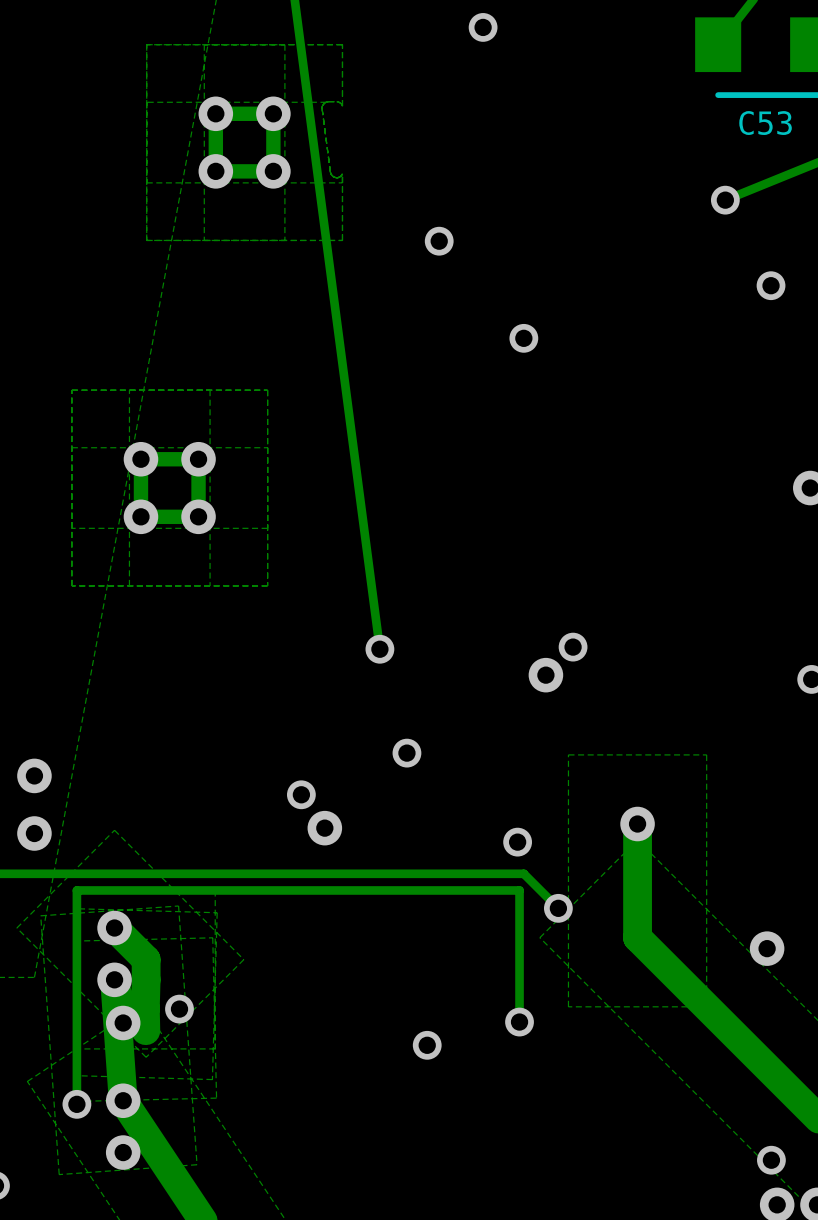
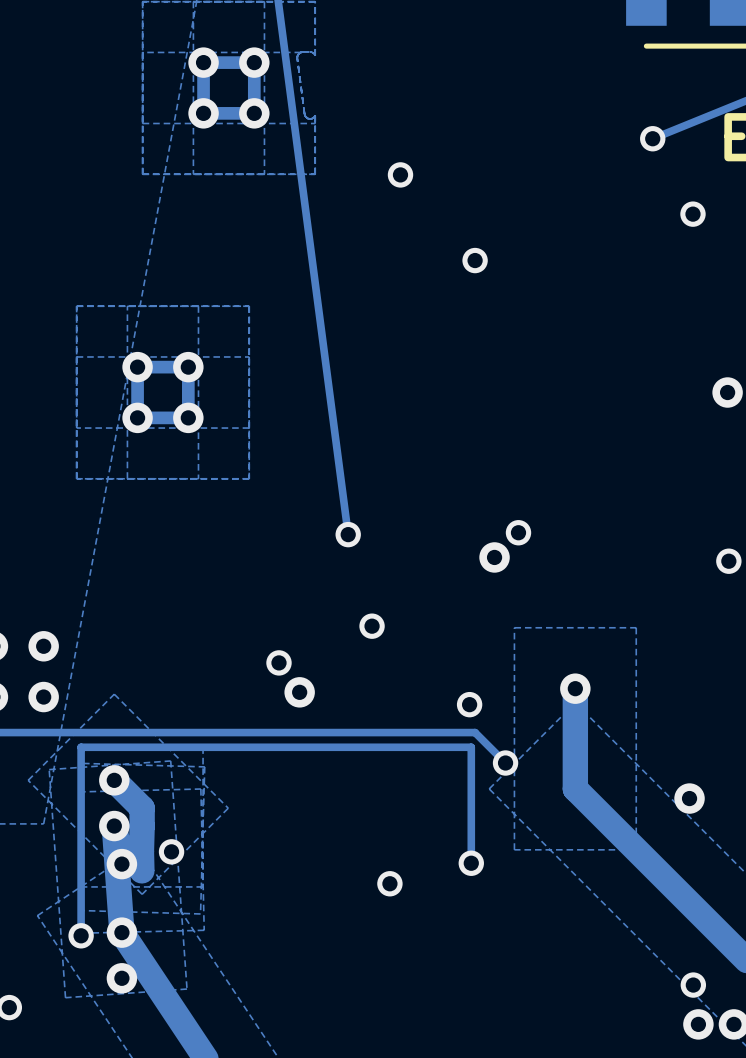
C53 name: C53 (765, 123) -> none

